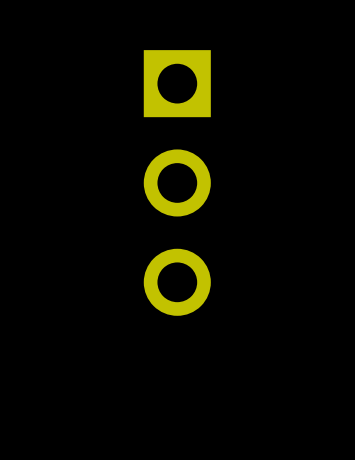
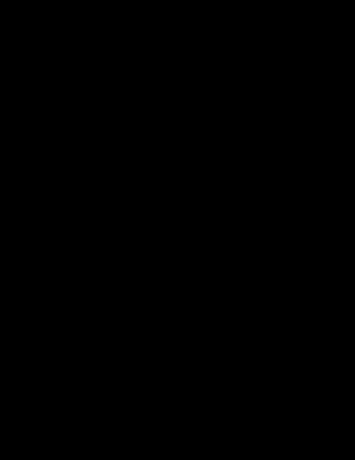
part: (177, 182) -> none

